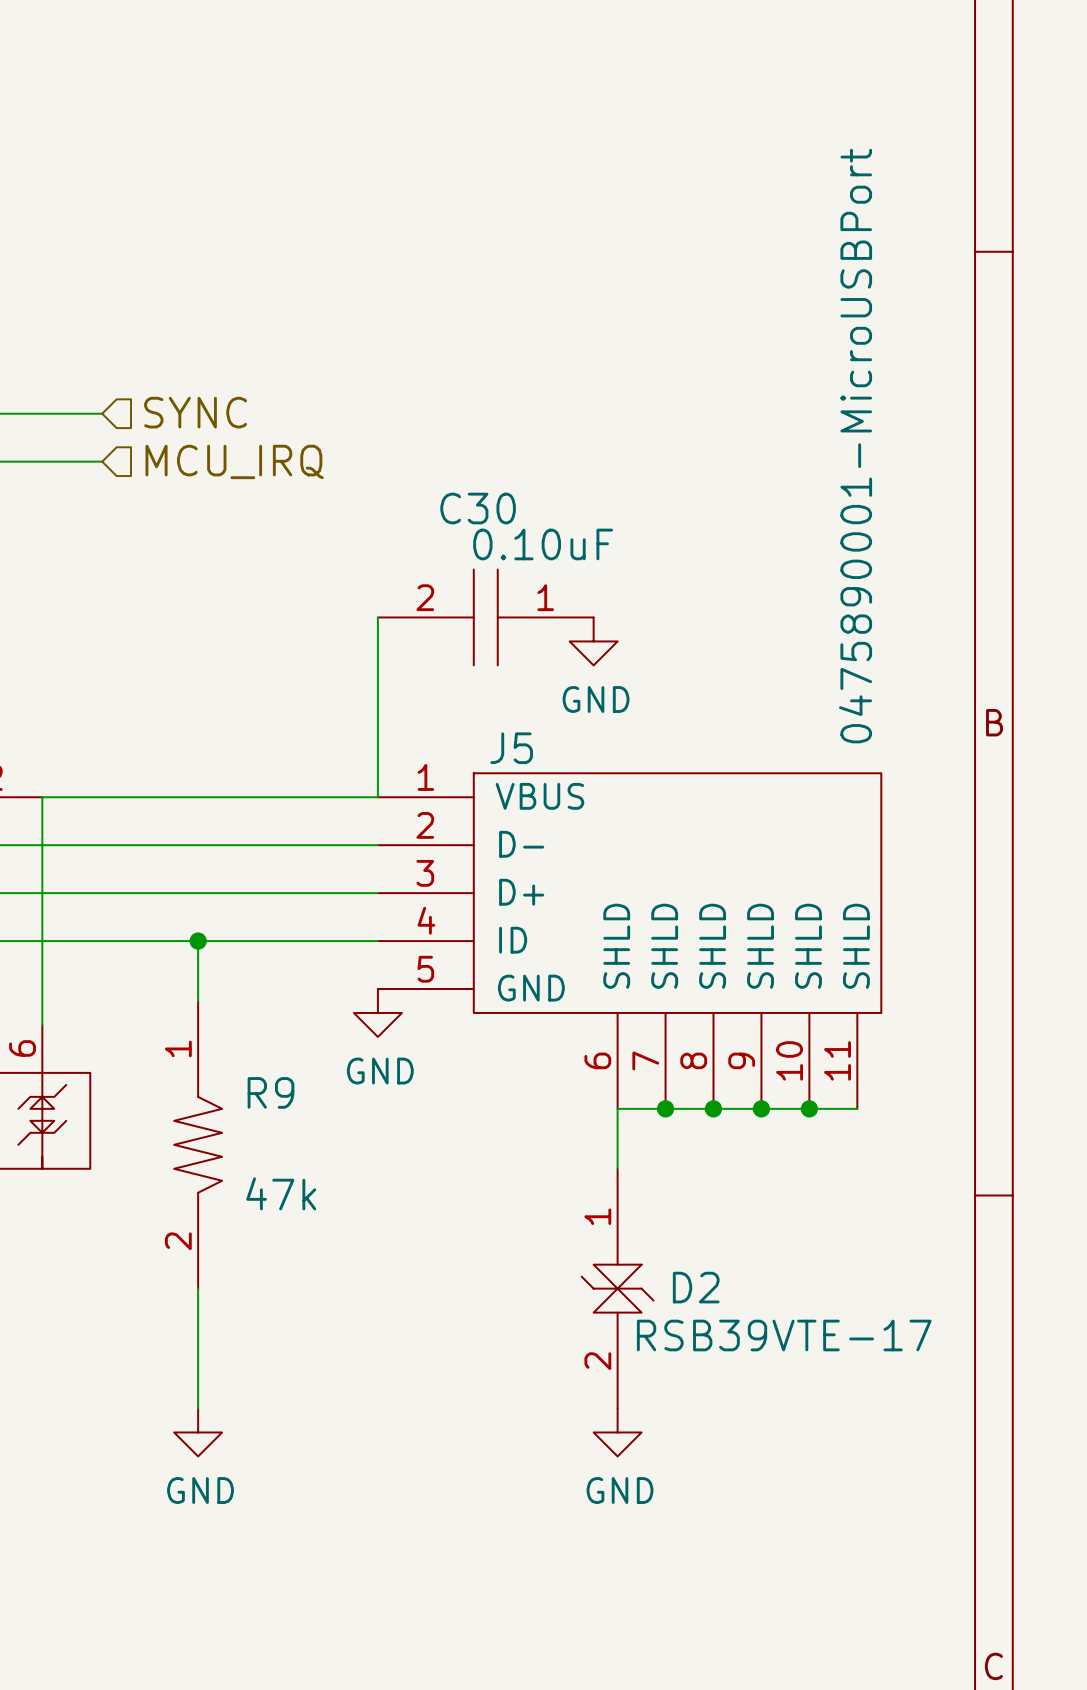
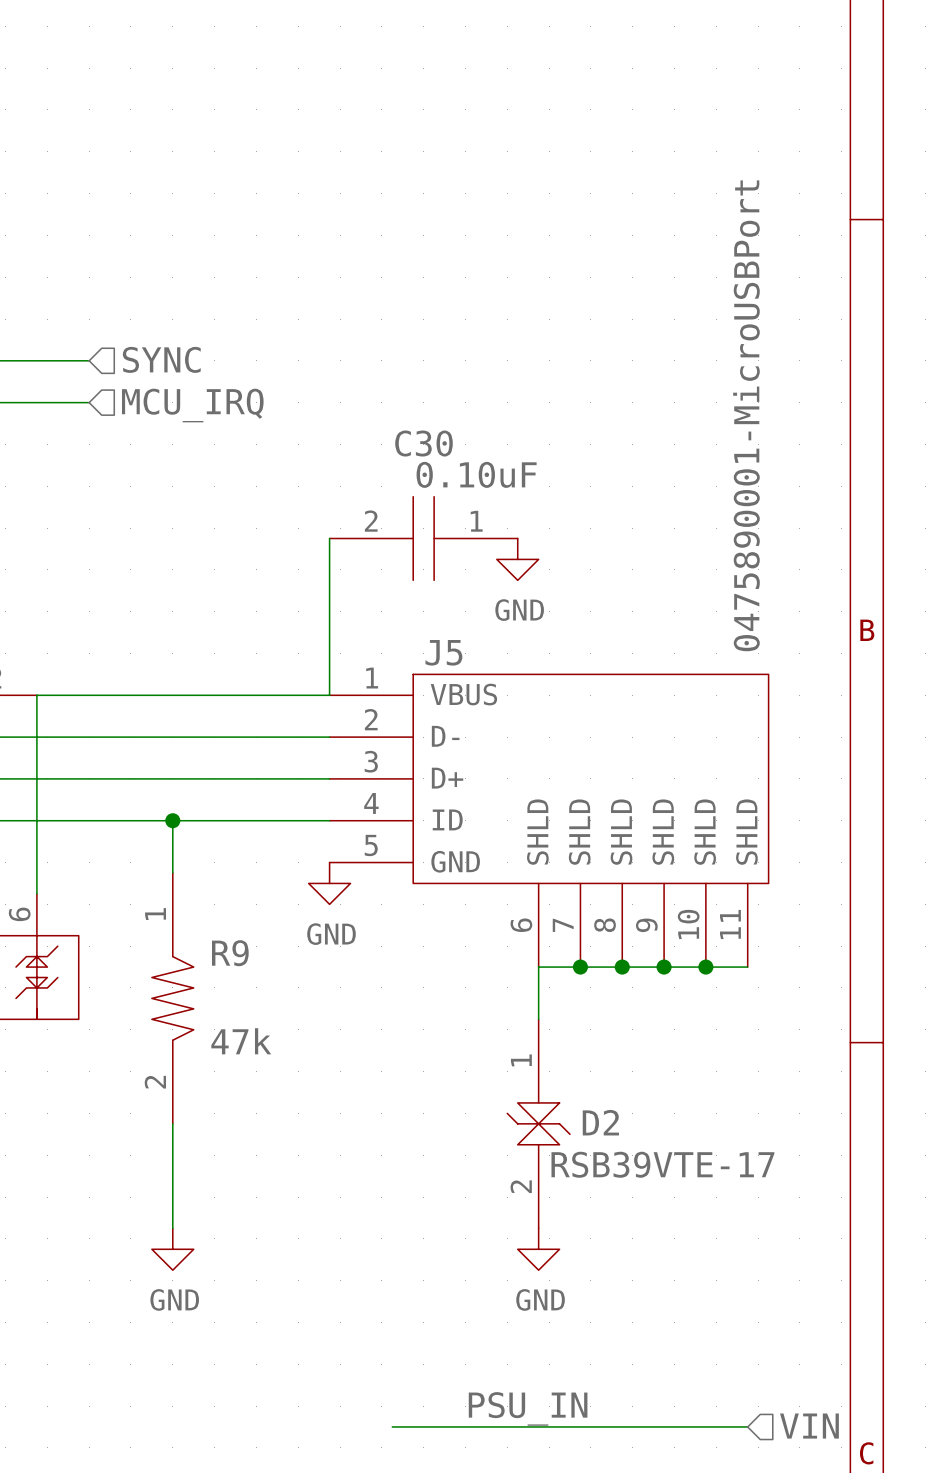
label: none -> PSU_IN (528, 1408)
hierarchical label: none -> VIN (809, 1426)
wire: none -> (392, 1426) (747, 1426)

